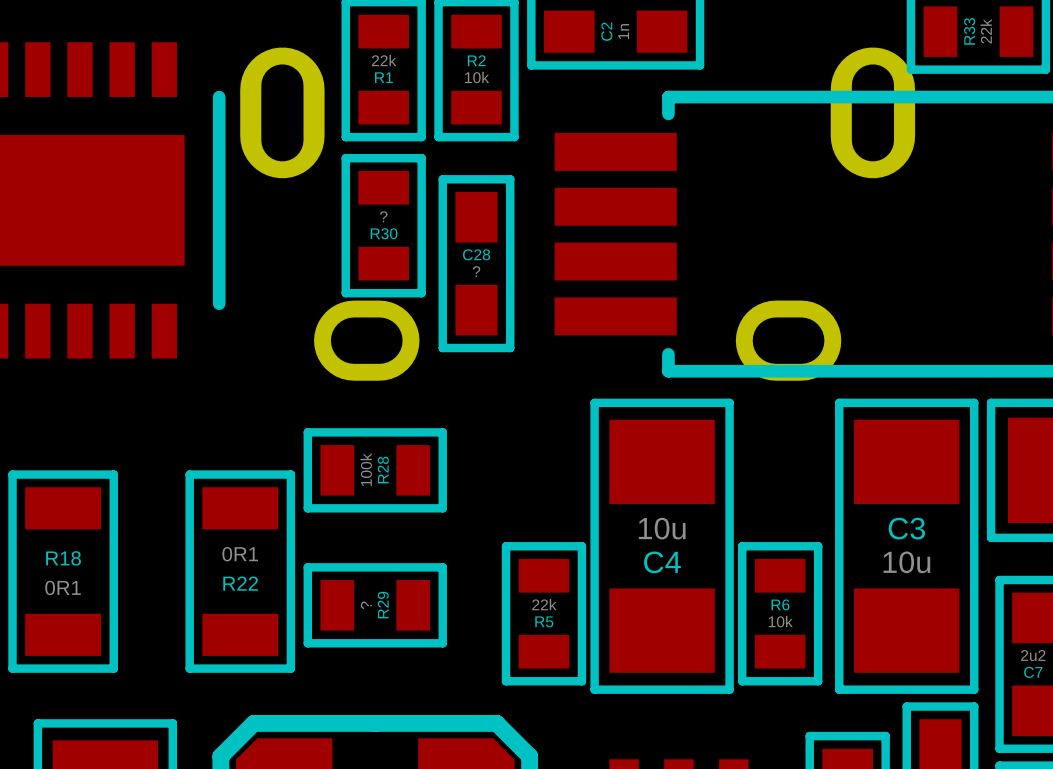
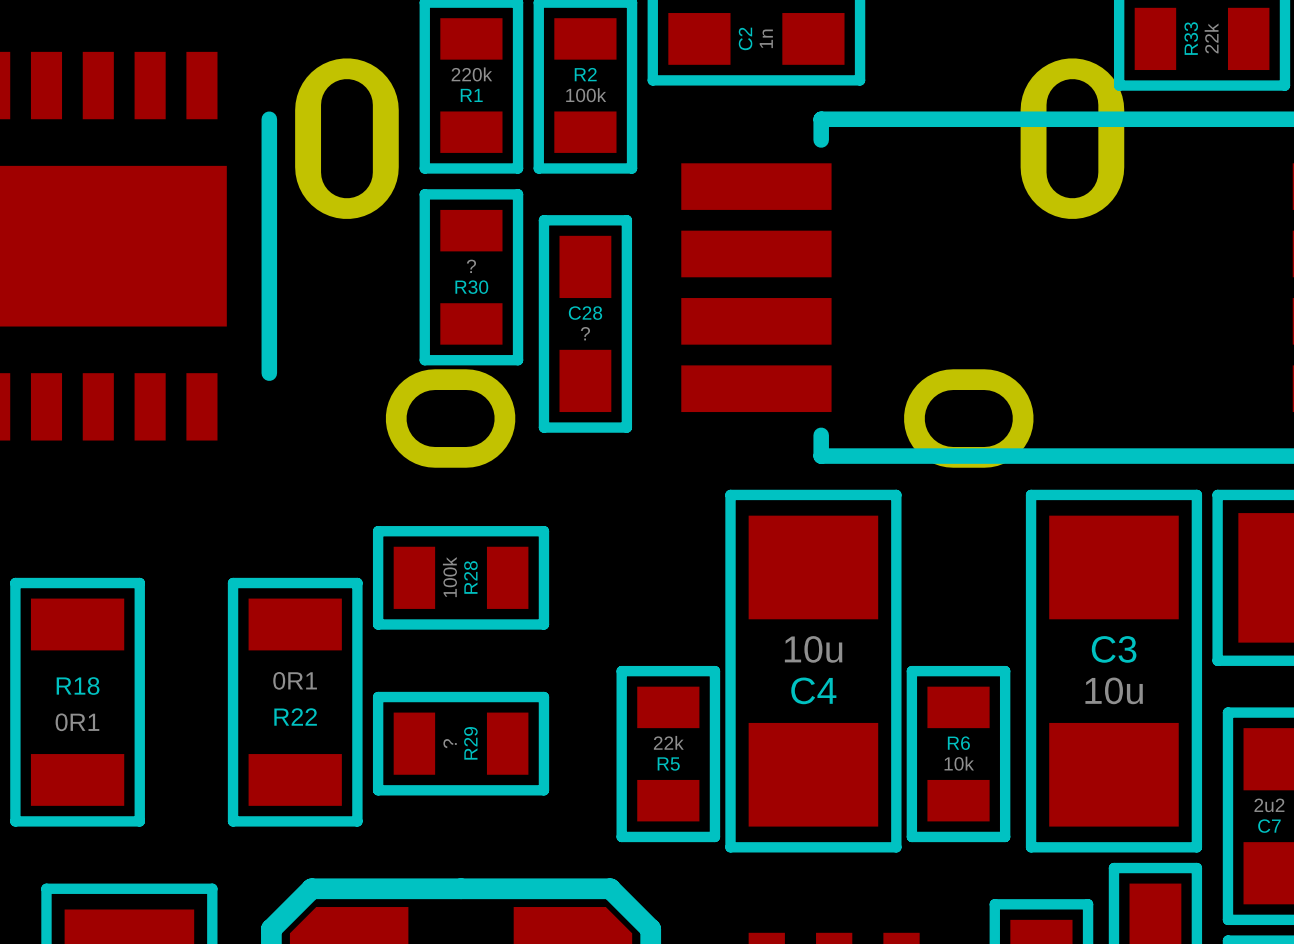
R1 value: 22k (384, 60) -> 220k (471, 74)
R2 value: 10k (477, 77) -> 100k (586, 95)

